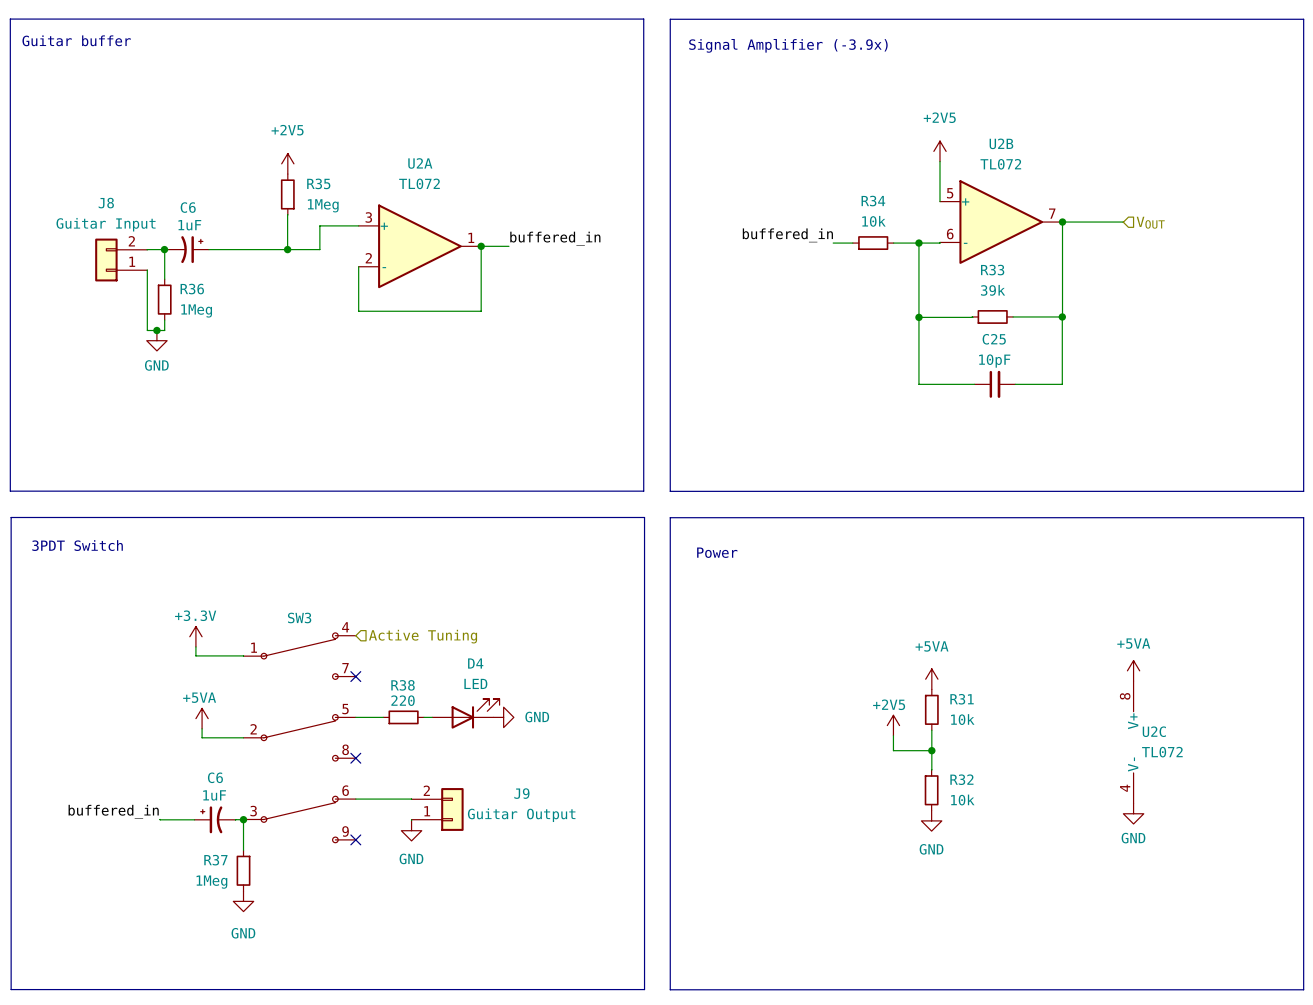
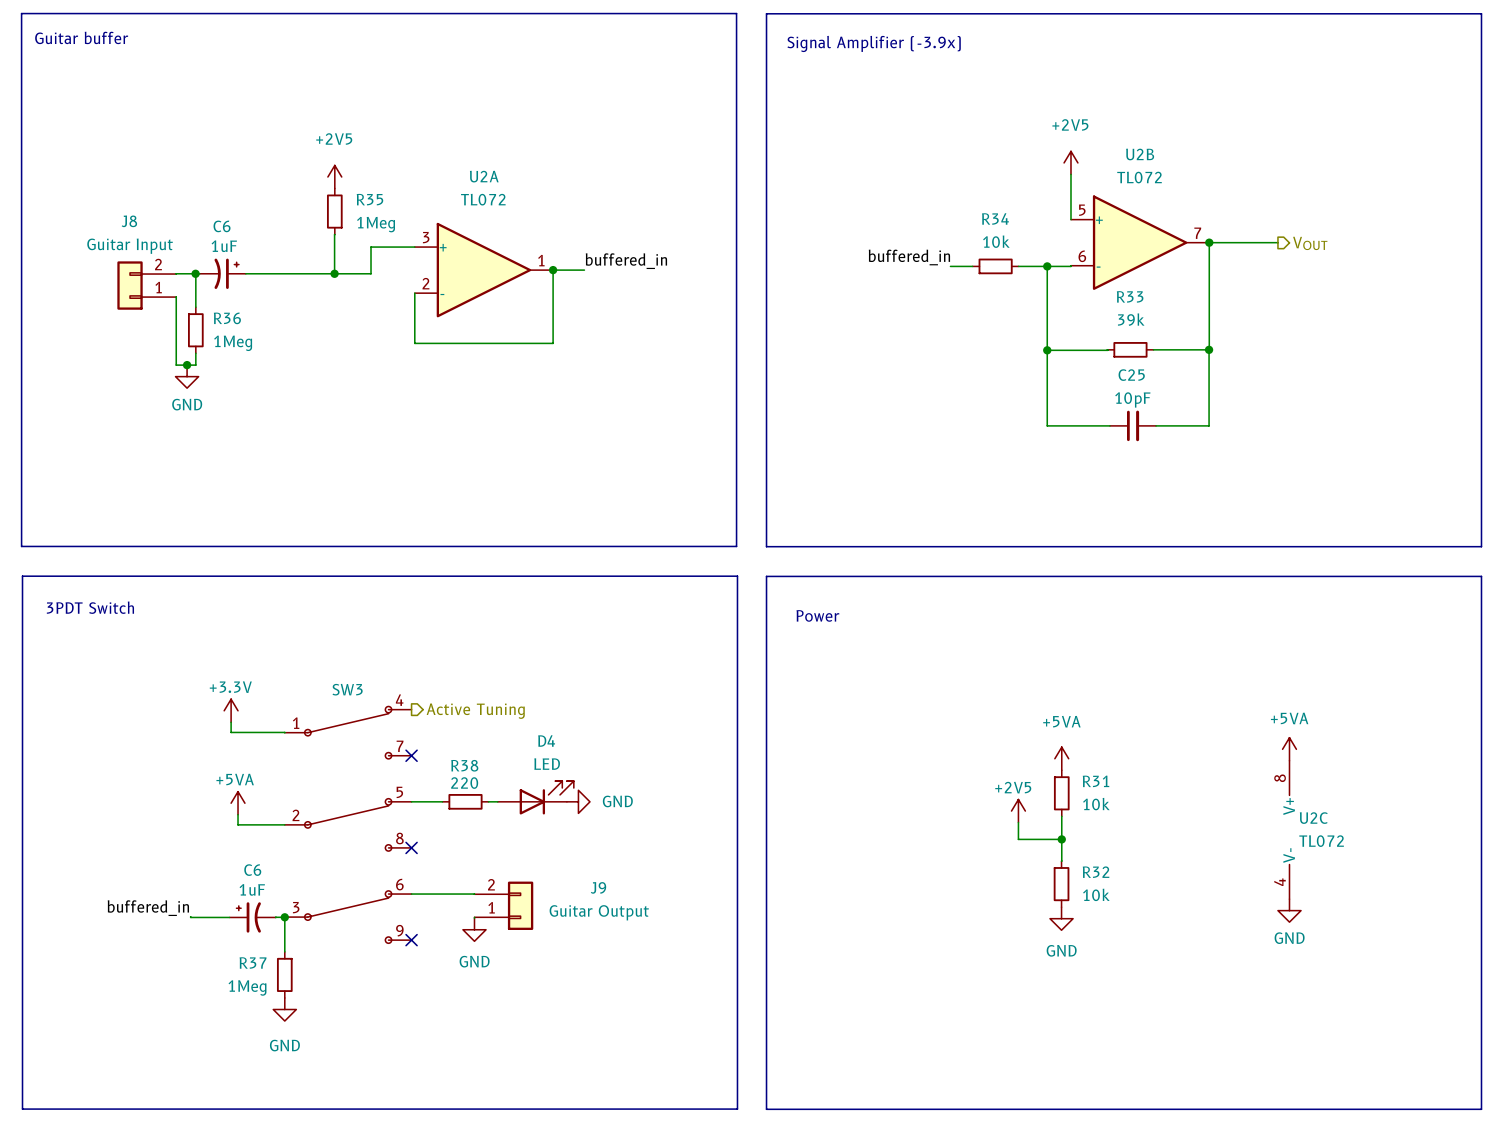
hierarchical label shape: input (1150, 222) -> output (1310, 243)
hierarchical label shape: input (423, 636) -> output (475, 711)

